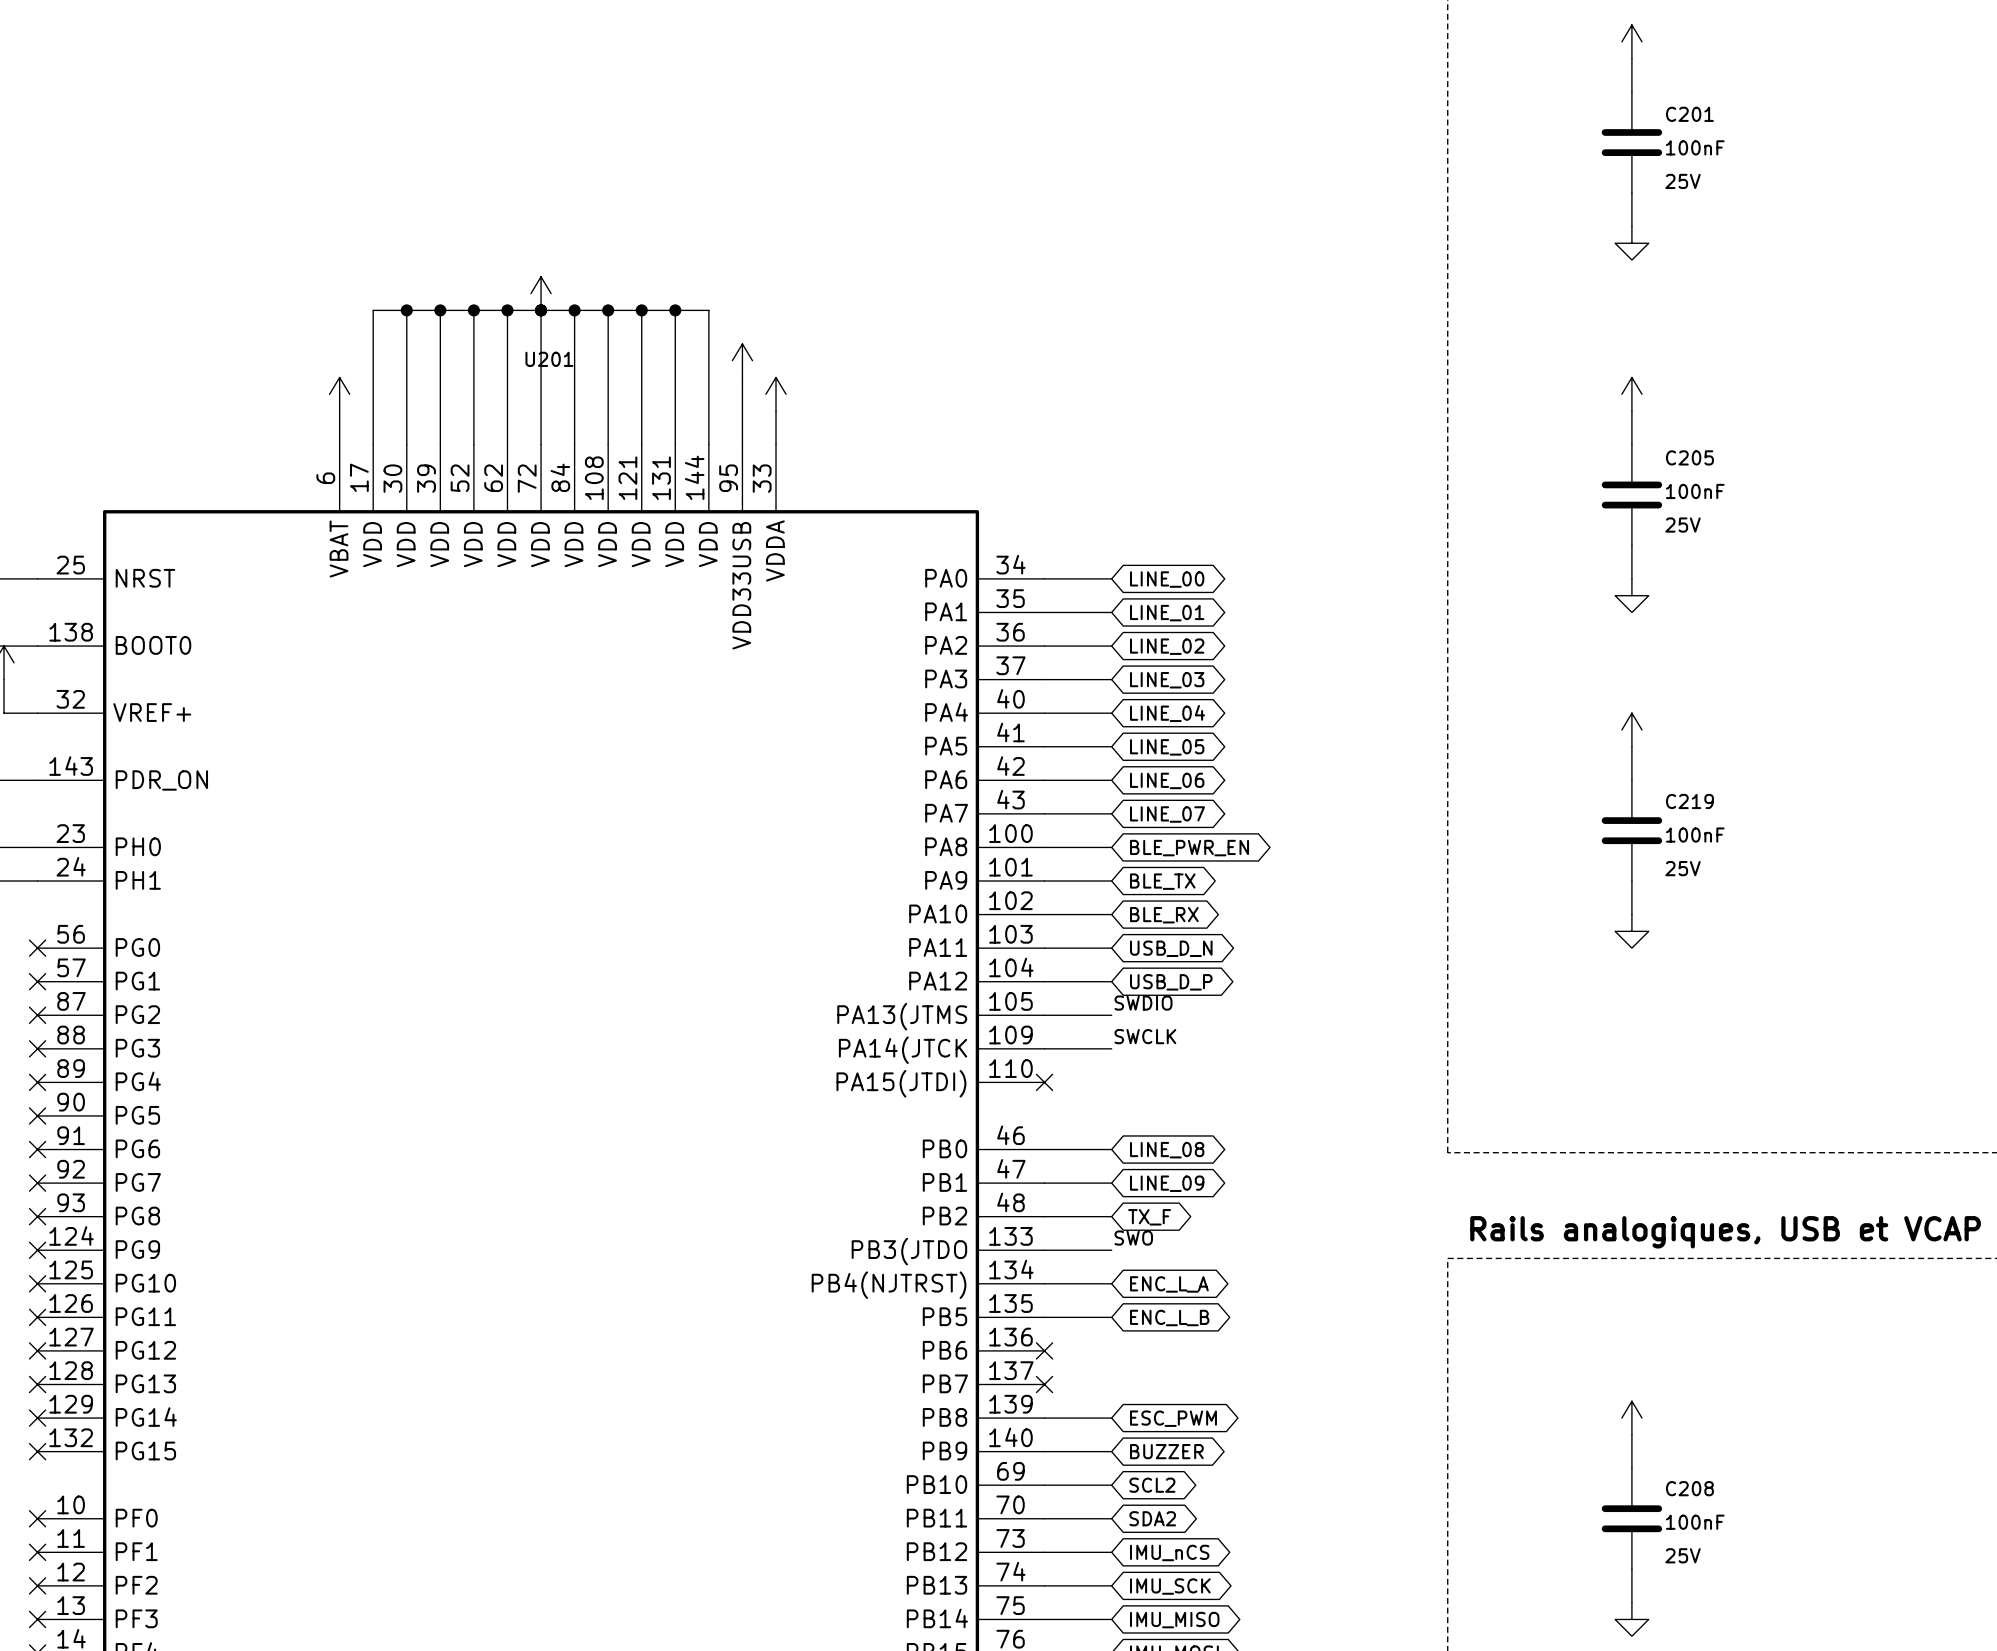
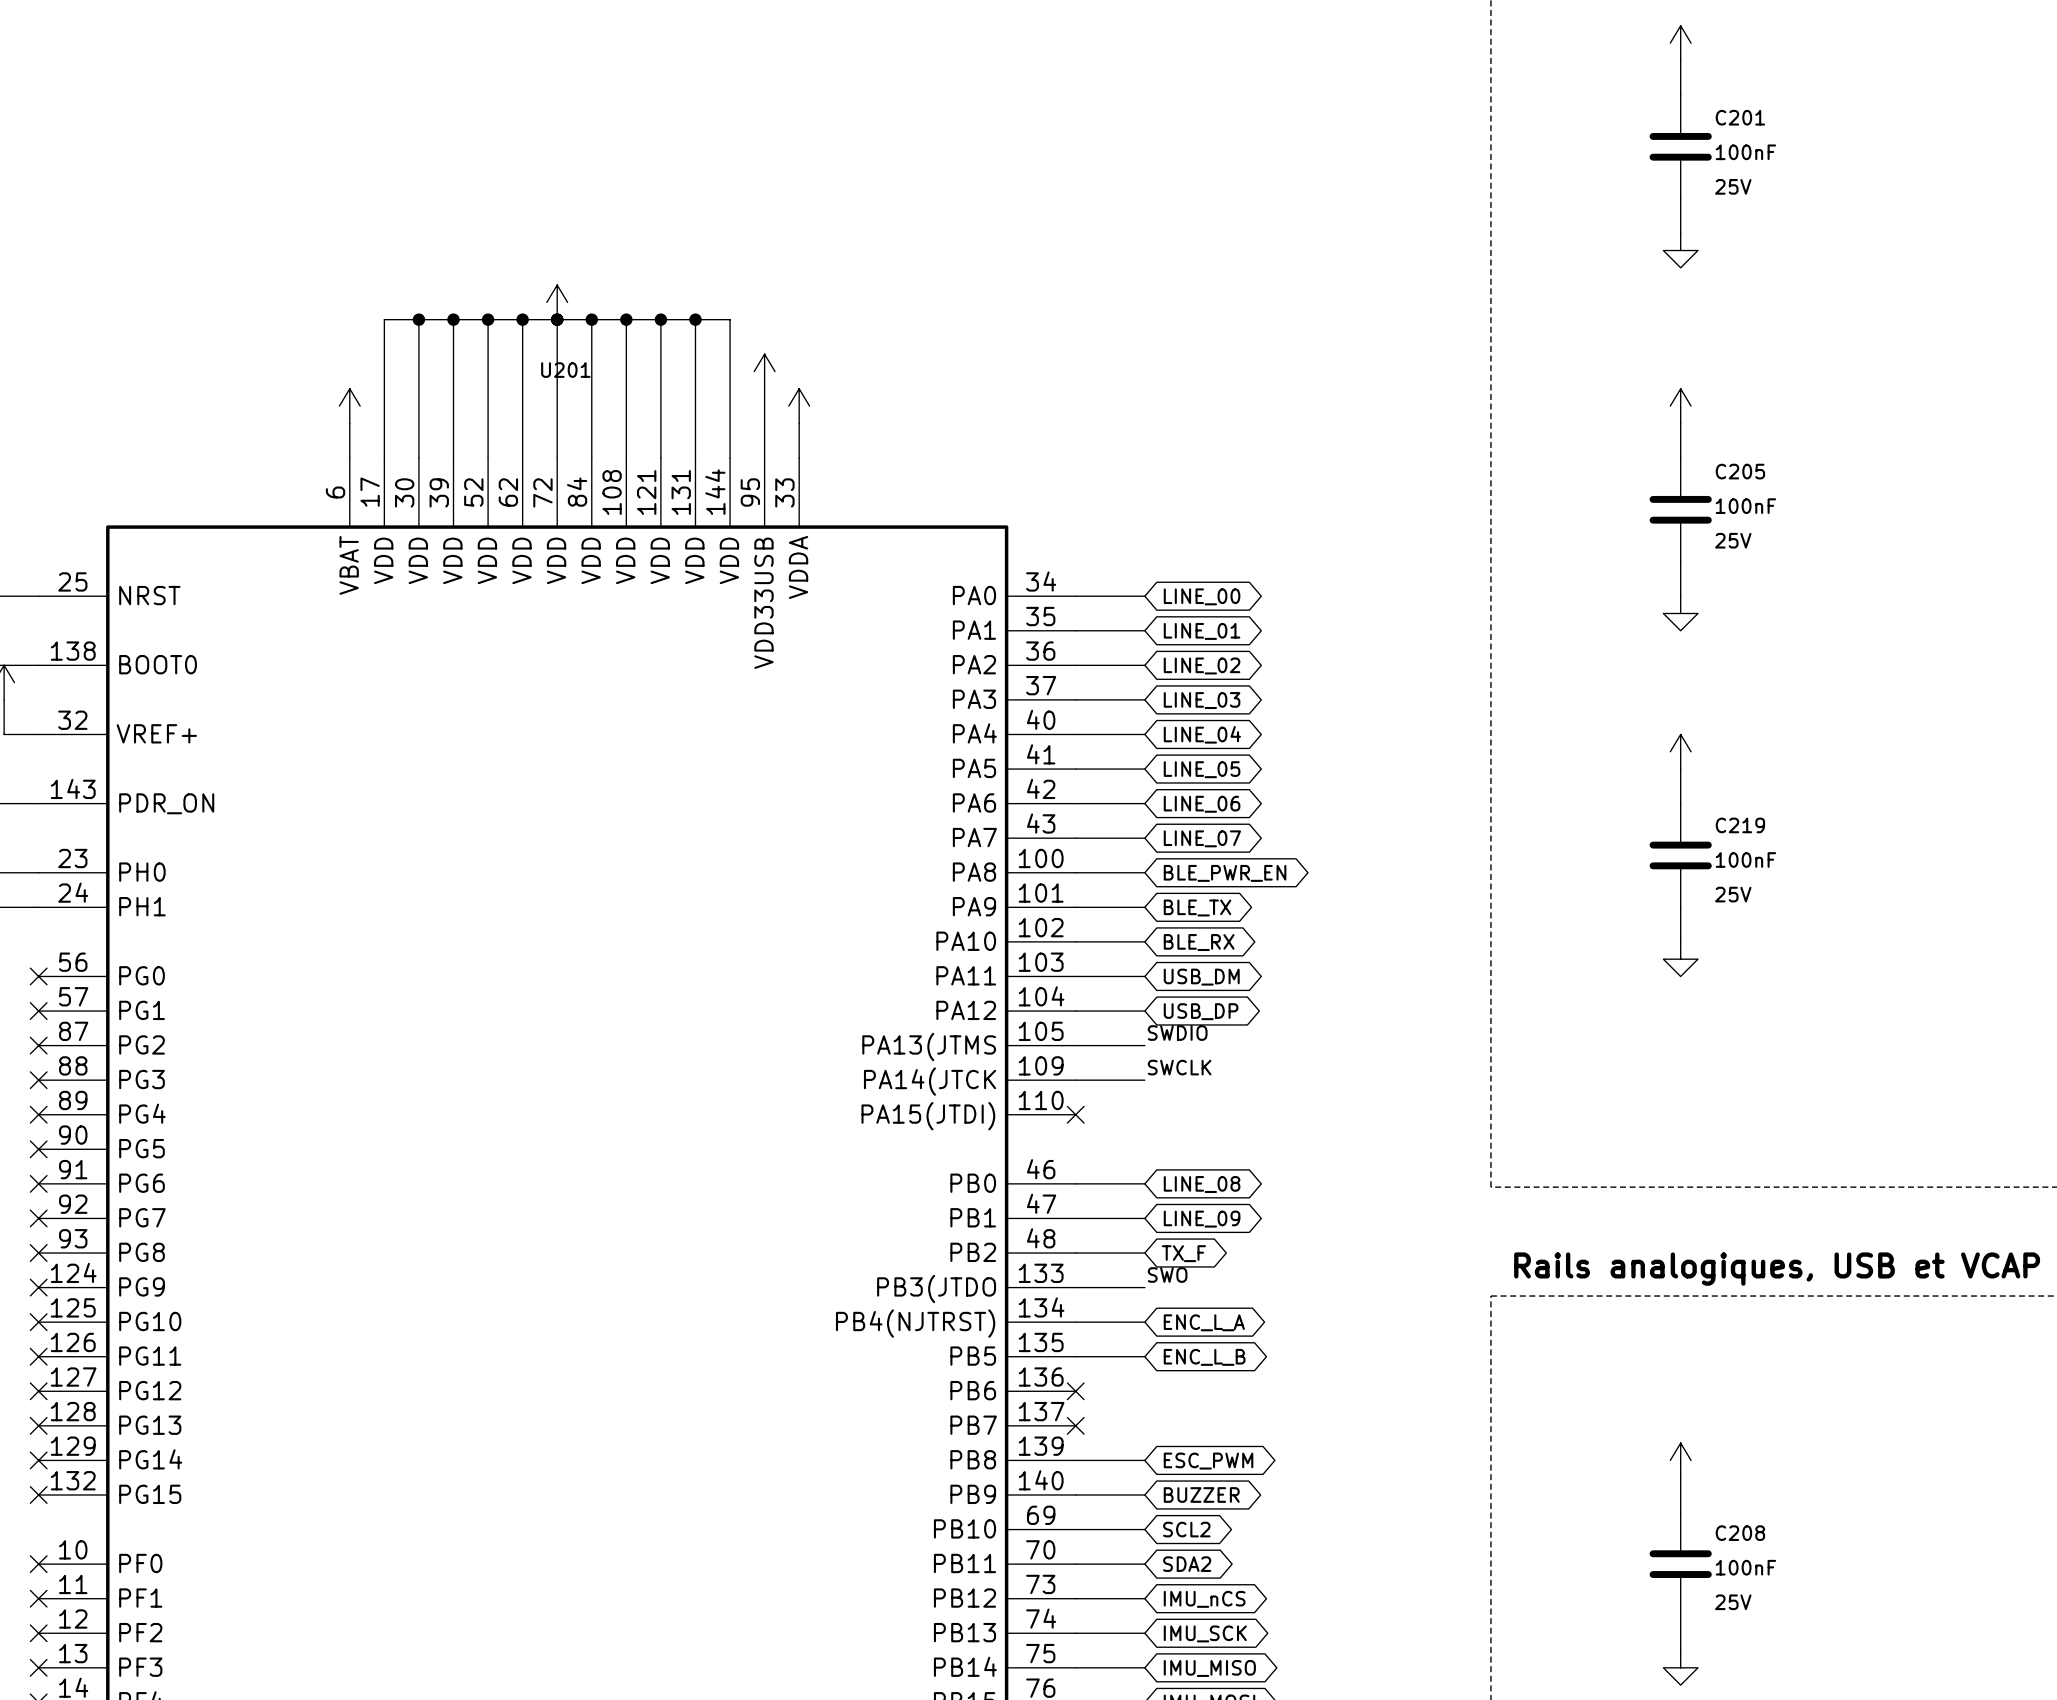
global label: USB_D_N (1171, 948) -> USB_DM (1201, 977)
global label: USB_D_P (1171, 982) -> USB_DP (1201, 1011)

